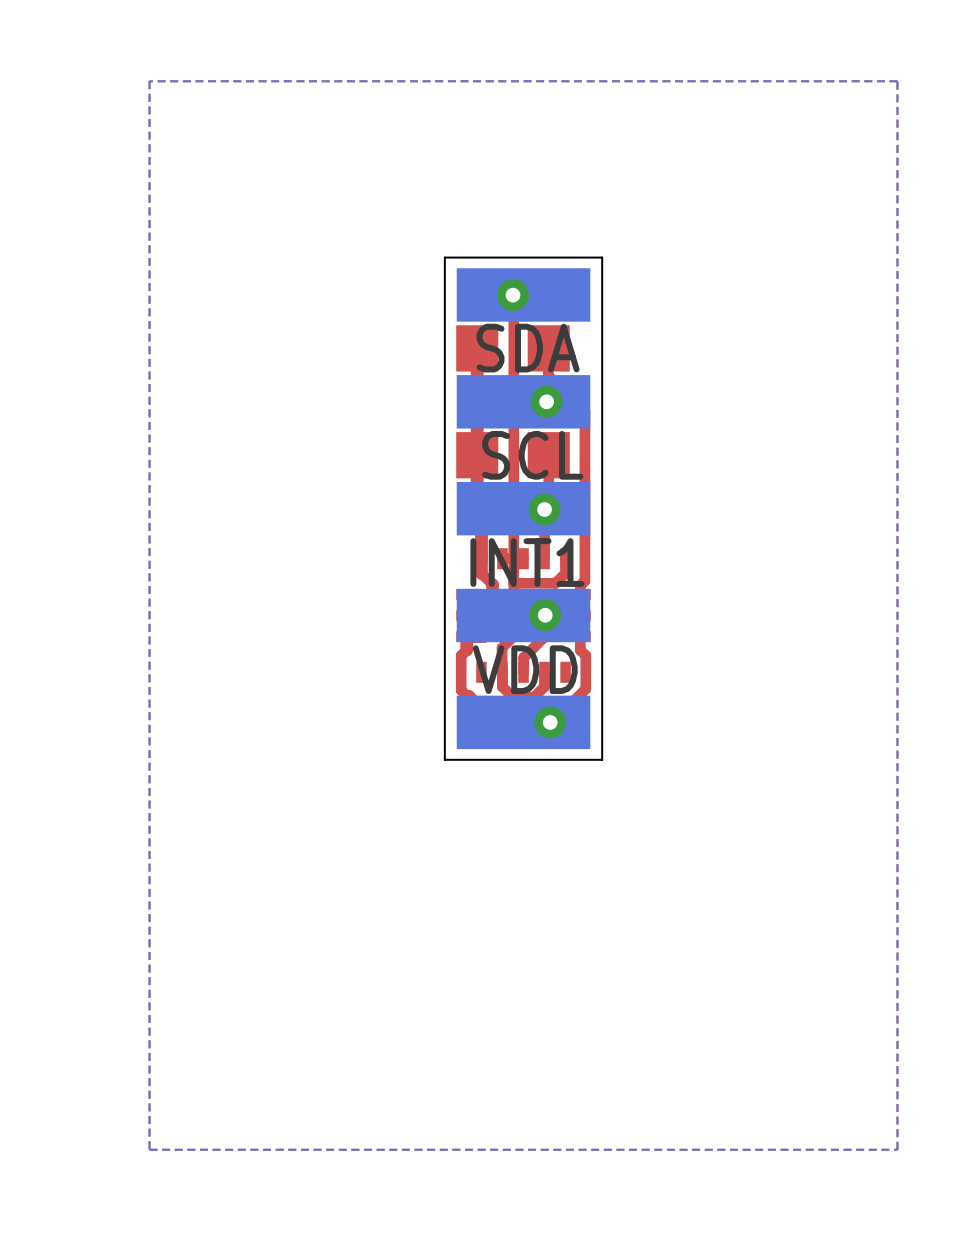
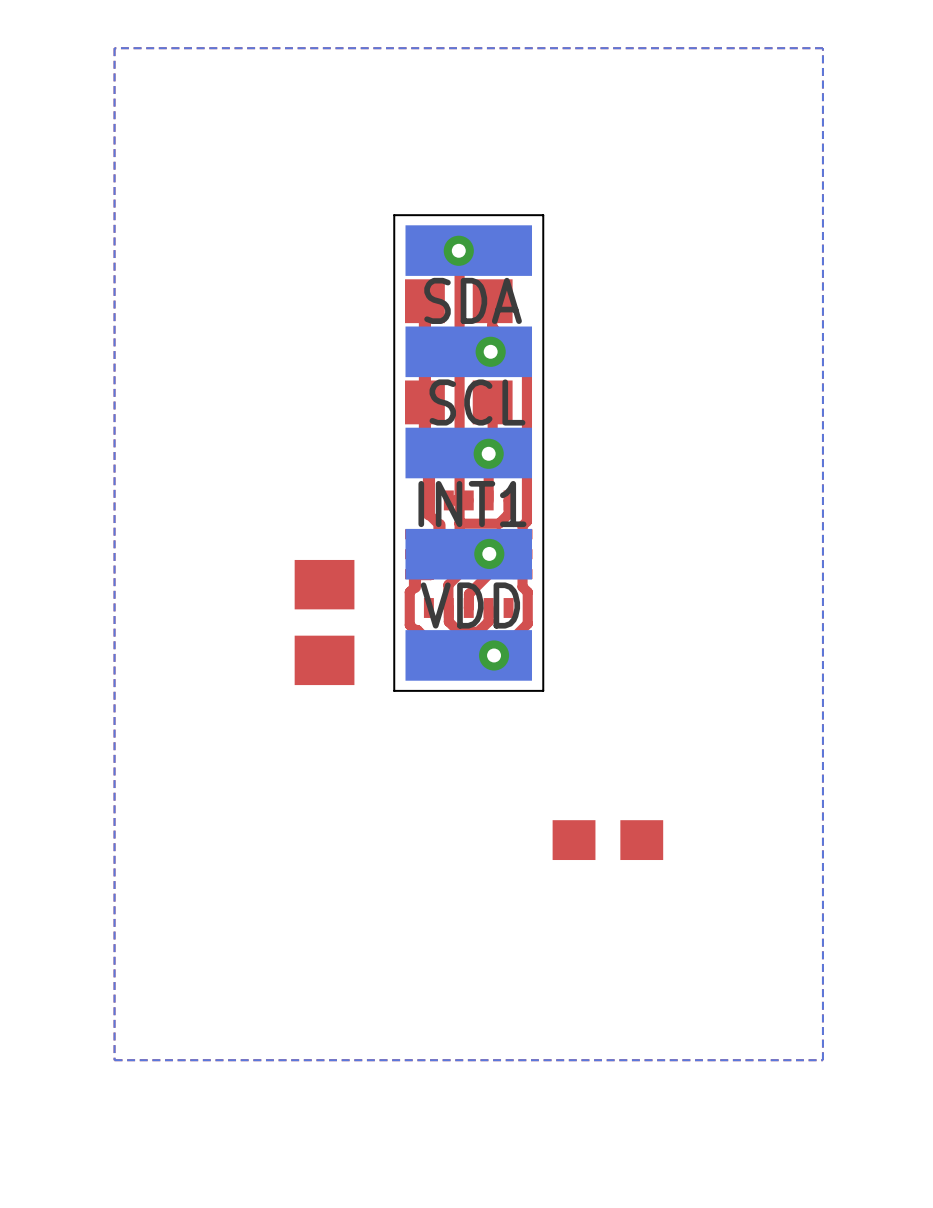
part: none -> (324, 622)
part: none -> (607, 840)

